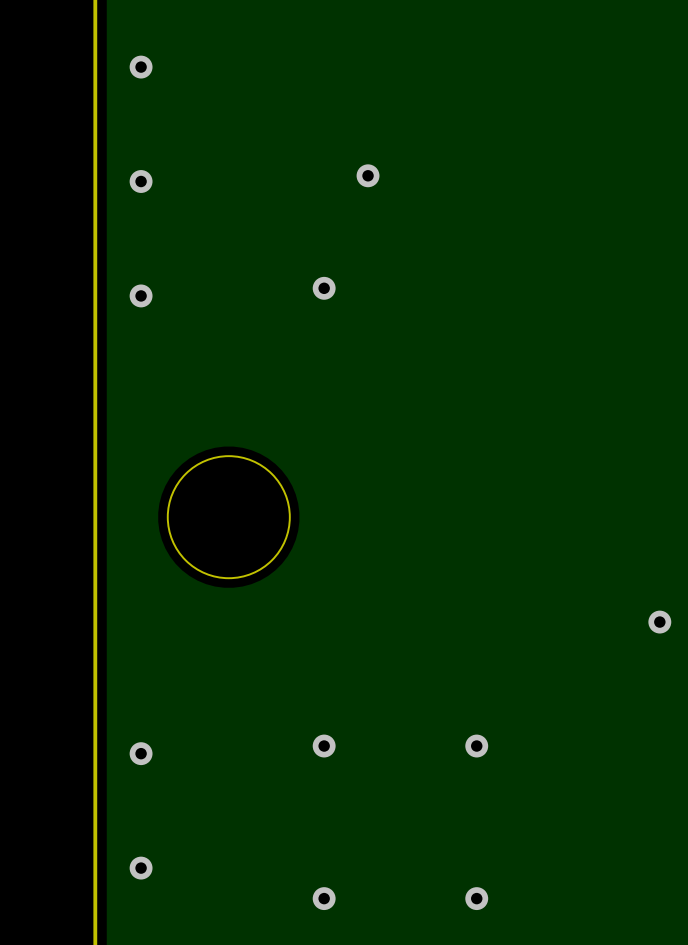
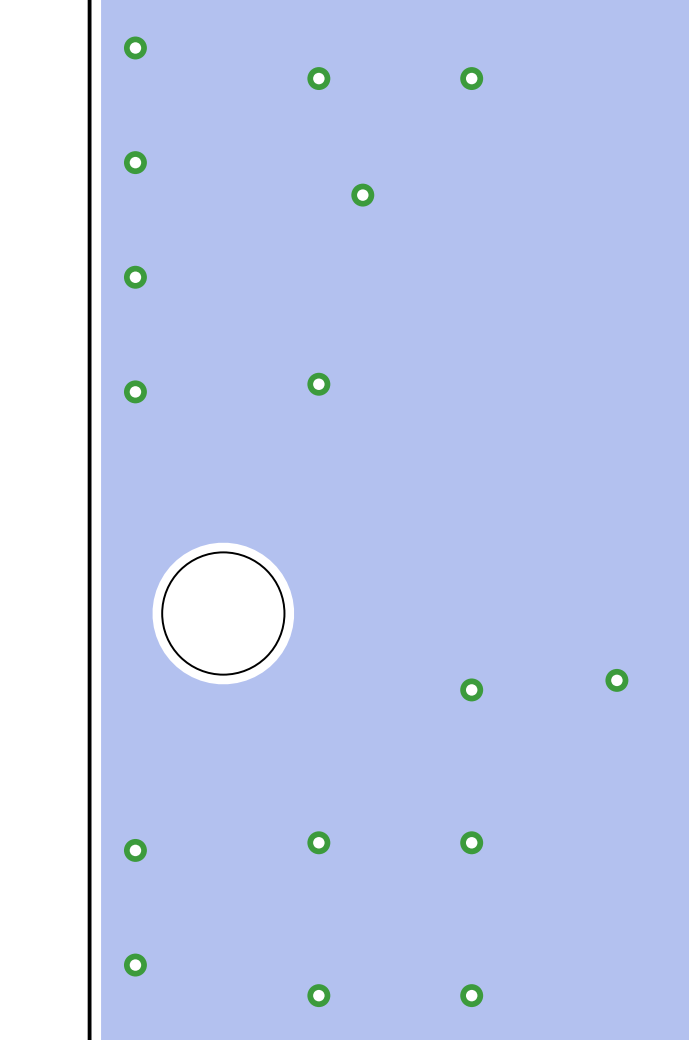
via position: (368, 175) -> (362, 195)
via: none -> (471, 689)
via position: (659, 622) -> (616, 680)

